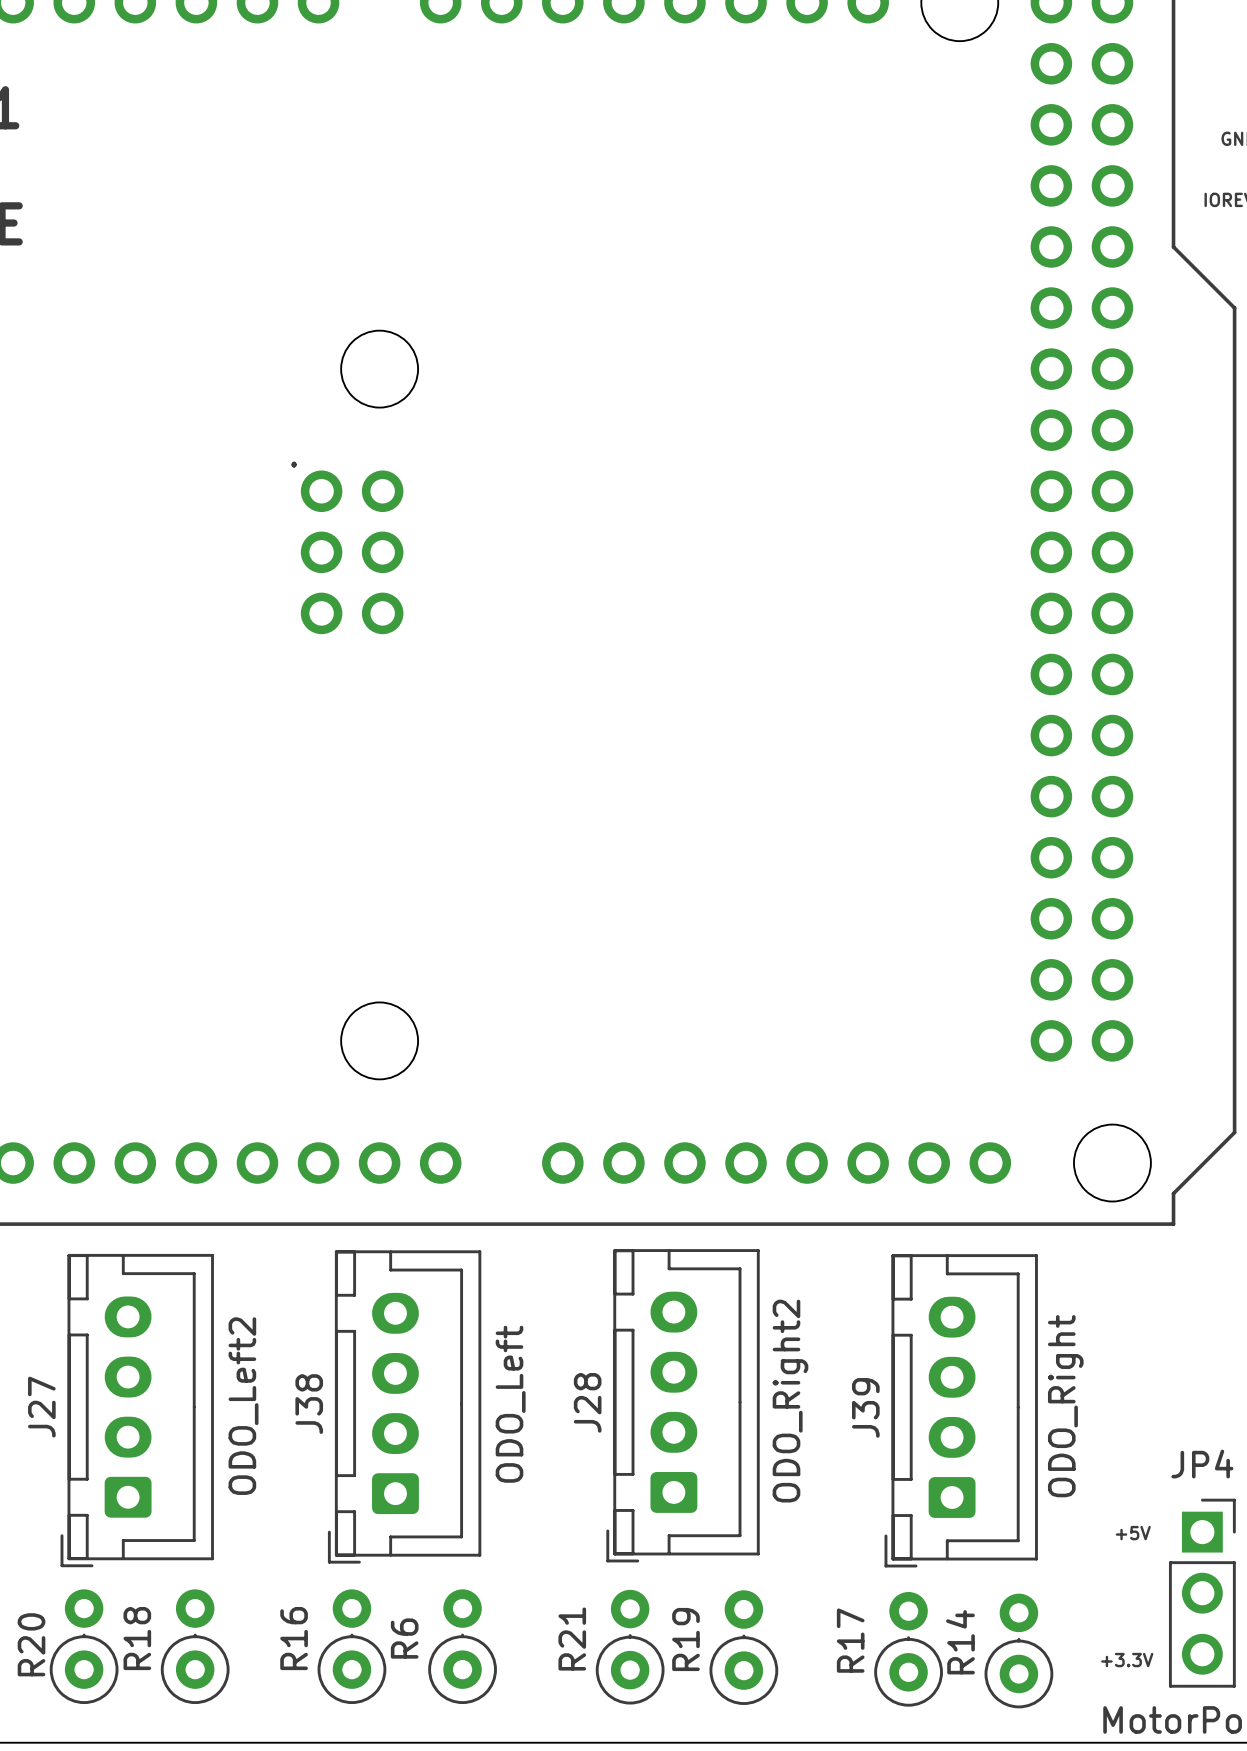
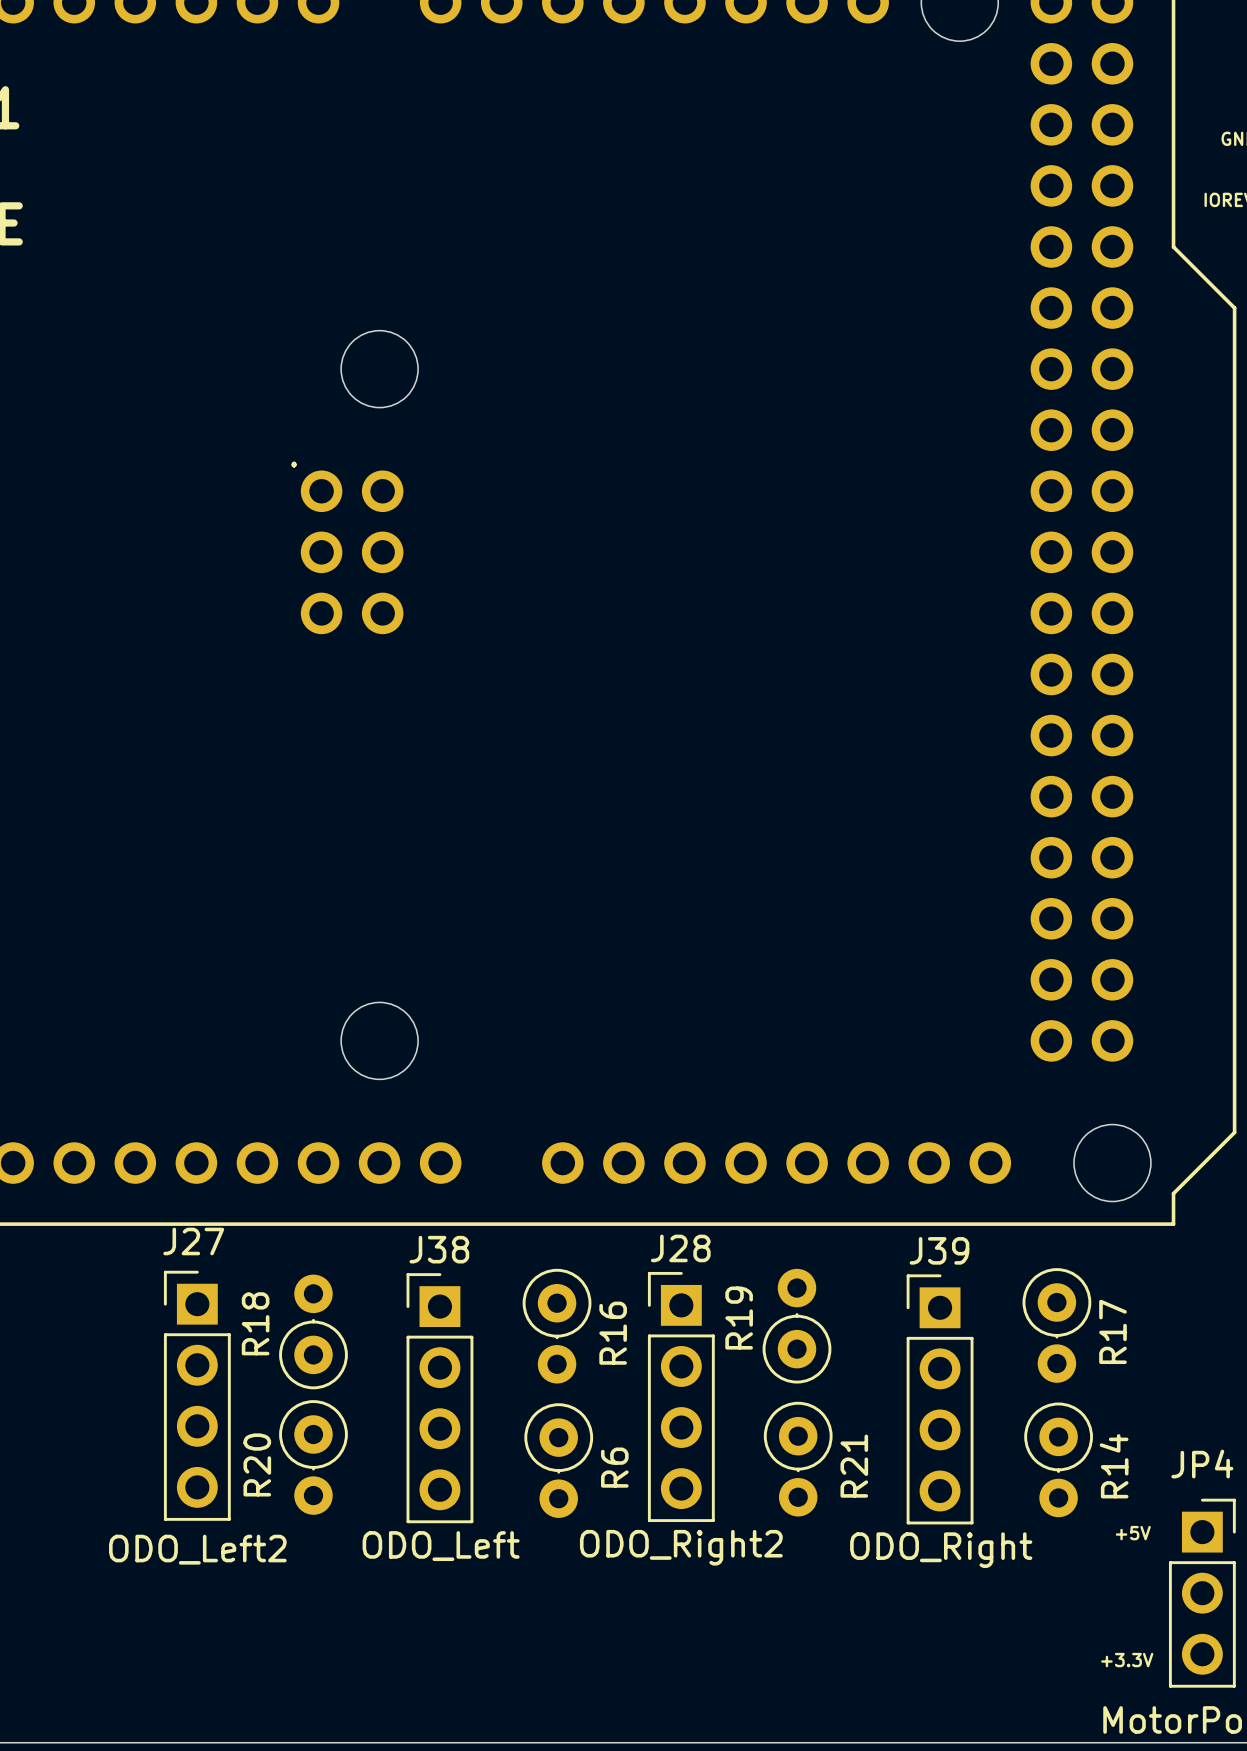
J28 footprint: [606, 1249, 760, 1563] -> [647, 1271, 715, 1523]
J38 footprint: [327, 1250, 482, 1564] -> [406, 1273, 474, 1524]
J27 footprint: [60, 1253, 214, 1568] -> [163, 1270, 231, 1521]
J39 footprint: [884, 1254, 1038, 1568] -> [906, 1274, 974, 1525]
J28 value position: ODO_Right2 (790, 1401) -> ODO_Right2 (681, 1547)
J28 name position: J28 (587, 1402) -> J28 (680, 1248)
J38 name position: J38 (309, 1404) -> J38 (439, 1249)
J38 value position: ODO_Left (510, 1404) -> ODO_Left (441, 1546)
J27 value position: ODO_Left2 (243, 1406) -> ODO_Left2 (197, 1549)
J39 value position: ODO_Right (1065, 1406) -> ODO_Right (941, 1550)
J27 name position: J27 (41, 1407) -> J27 (193, 1241)
J39 name position: J39 (865, 1407) -> J39 (939, 1250)
R20 rotation: 0° (84, 1646) -> 180° (313, 1457)
R20 position: (84, 1646) -> (313, 1457)
R18 position: (195, 1646) -> (313, 1331)
R16 rotation: 0° (351, 1646) -> 180° (557, 1326)
R16 position: (351, 1646) -> (557, 1326)
R6 rotation: 0° (462, 1646) -> 180° (558, 1460)
R6 position: (462, 1646) -> (558, 1460)
R21 rotation: 0° (630, 1647) -> 180° (798, 1459)
R21 position: (630, 1647) -> (798, 1459)
R19 position: (743, 1647) -> (797, 1326)
R17 rotation: 0° (908, 1649) -> 180° (1056, 1325)
R17 position: (908, 1649) -> (1056, 1325)
R14 rotation: 0° (1018, 1651) -> 180° (1058, 1459)
R14 position: (1018, 1651) -> (1058, 1459)

